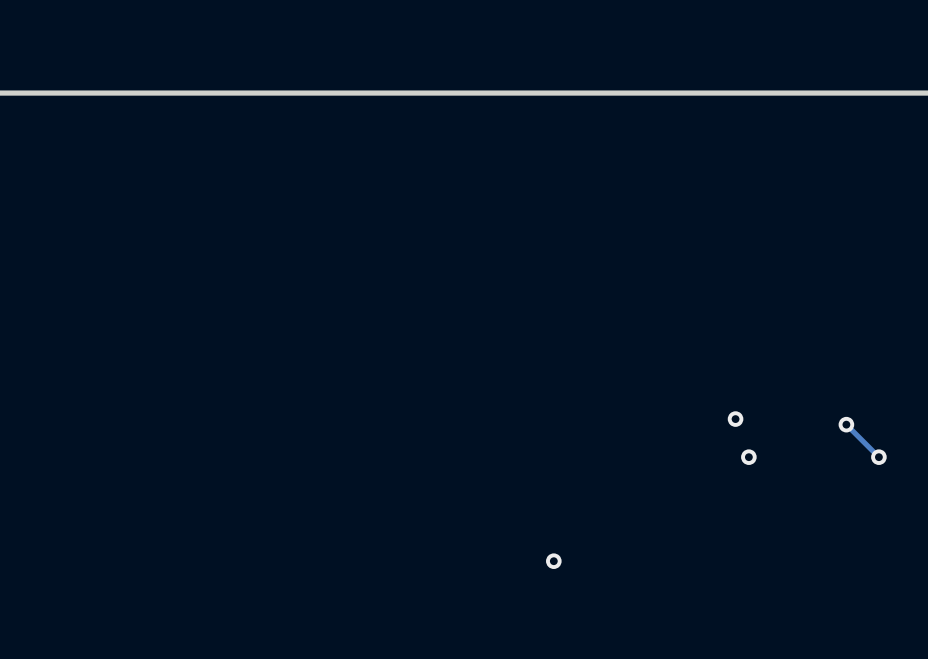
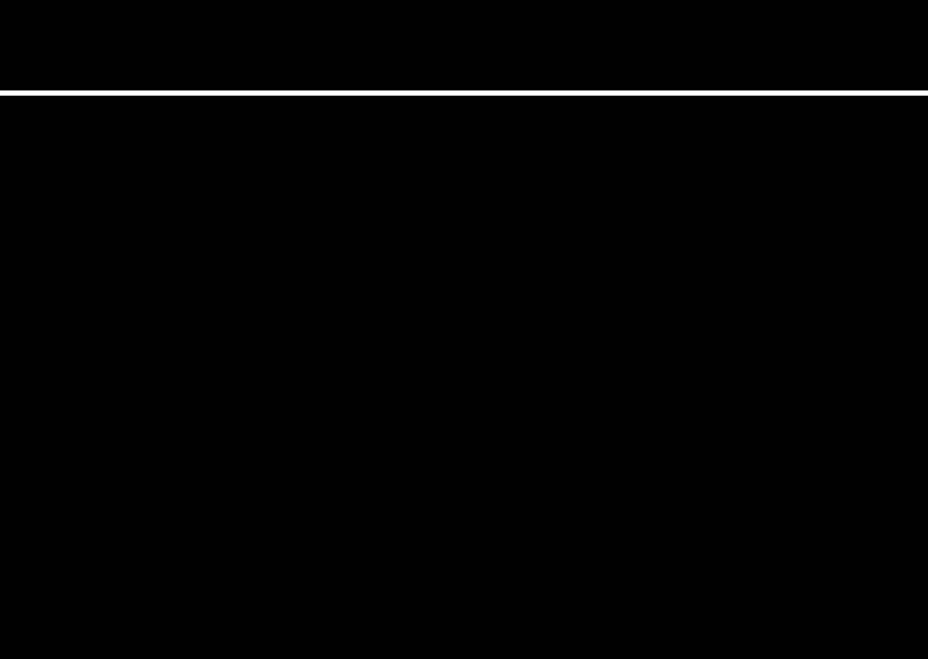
via: (735, 419) -> none
track: (846, 424) (878, 457) -> none
via: (846, 424) -> none
via: (748, 457) -> none
via: (878, 457) -> none
via: (553, 561) -> none

